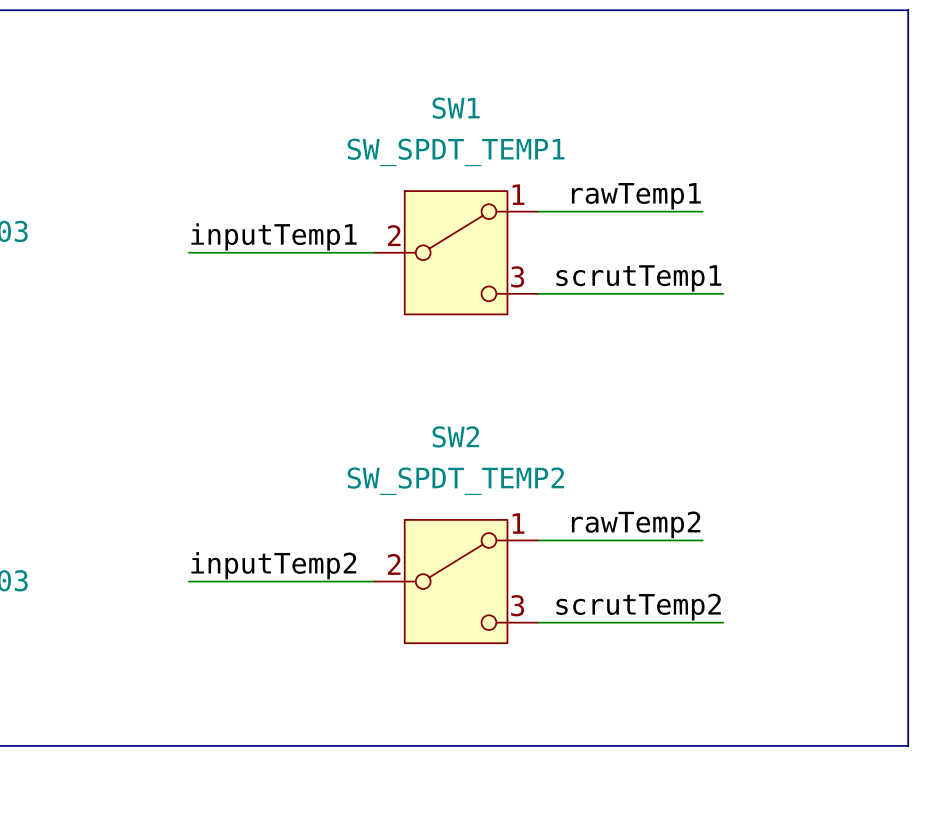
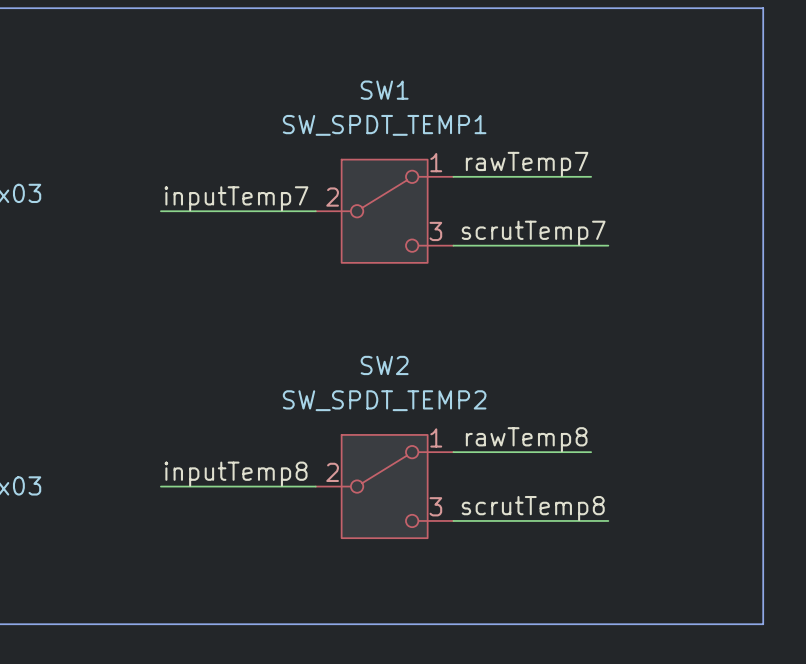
label: rawTemp1 (636, 196) -> rawTemp7 (527, 164)
label: inputTemp1 (274, 236) -> inputTemp7 (236, 198)
label: scrutTemp1 (638, 278) -> scrutTemp7 (533, 233)
label: rawTemp2 (636, 524) -> rawTemp8 (526, 439)
label: inputTemp2 (273, 565) -> inputTemp8 (236, 474)
label: scrutTemp2 (638, 607) -> scrutTemp8 (533, 508)

